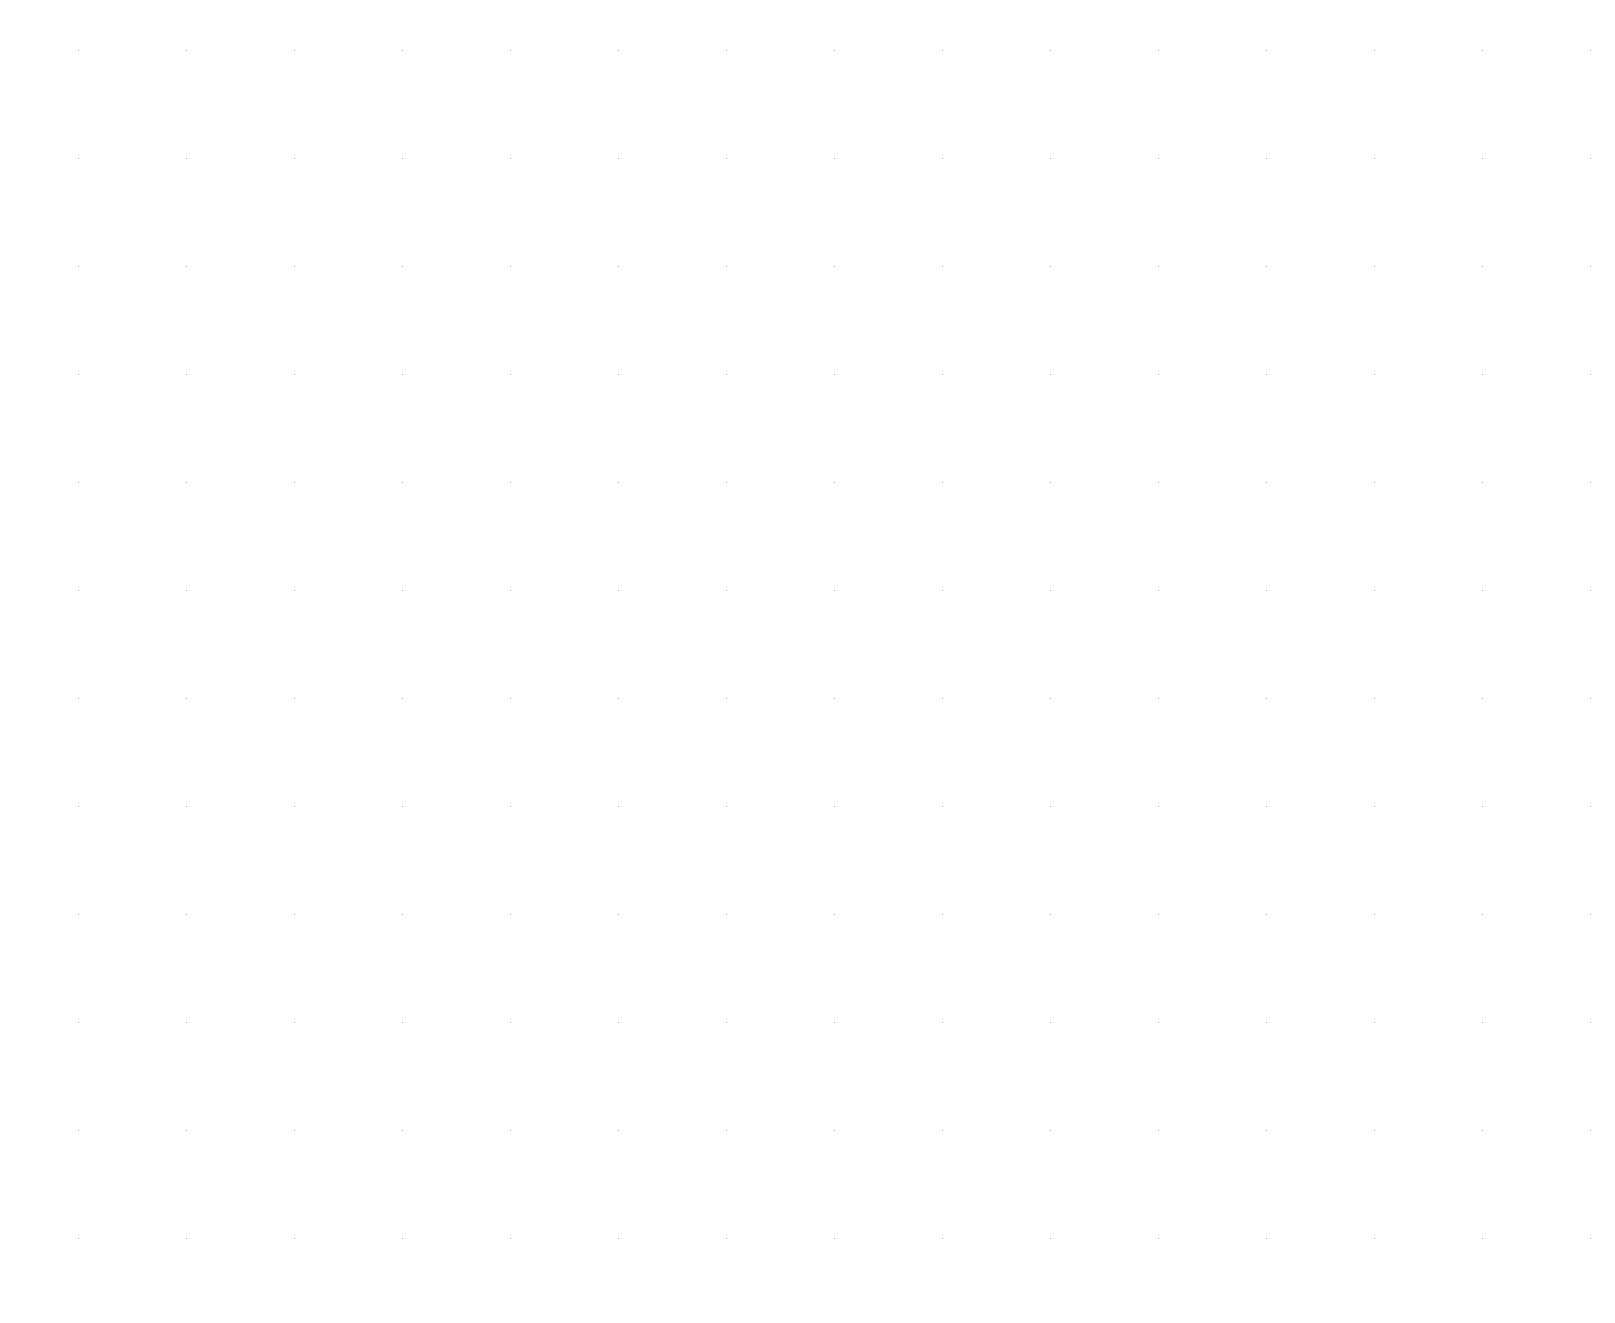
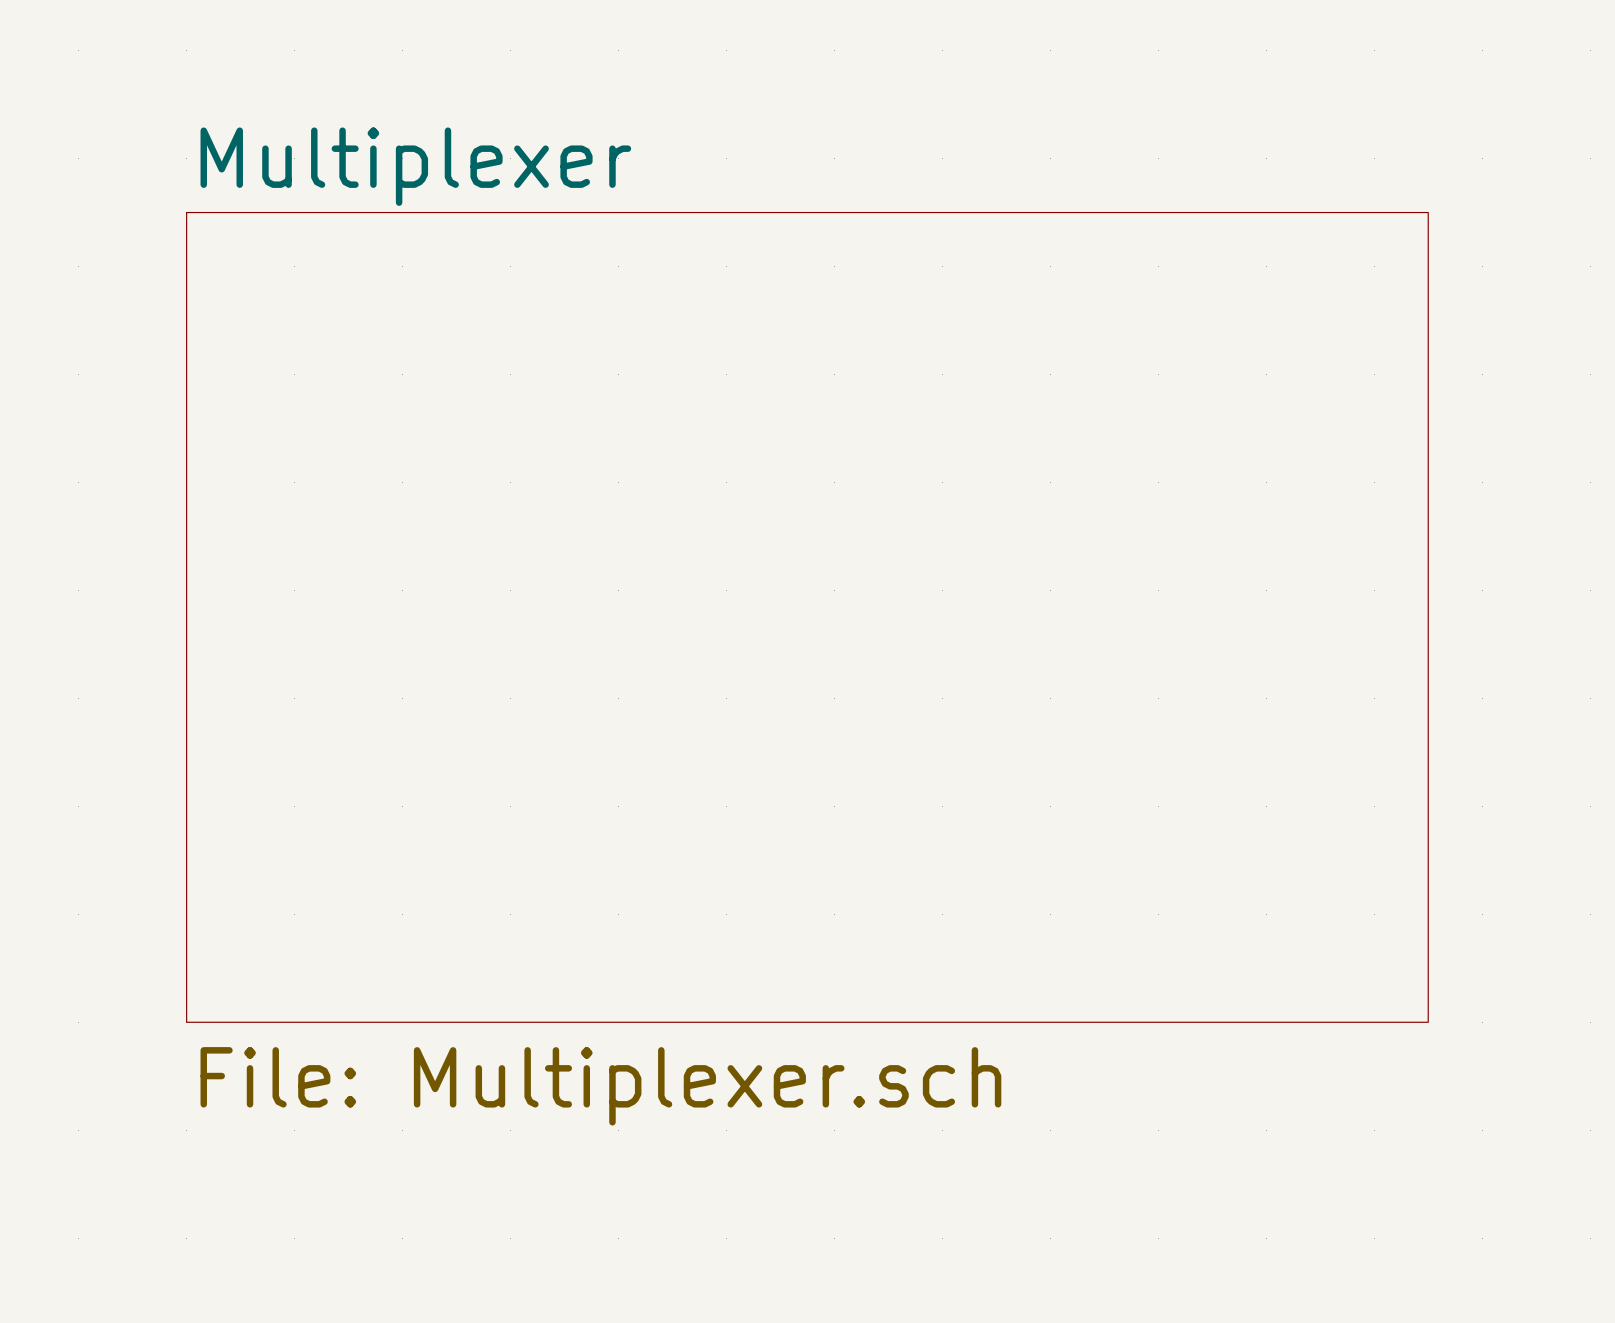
sheet Multiplexer: none -> File: Multiplexer.sch (807, 617)

